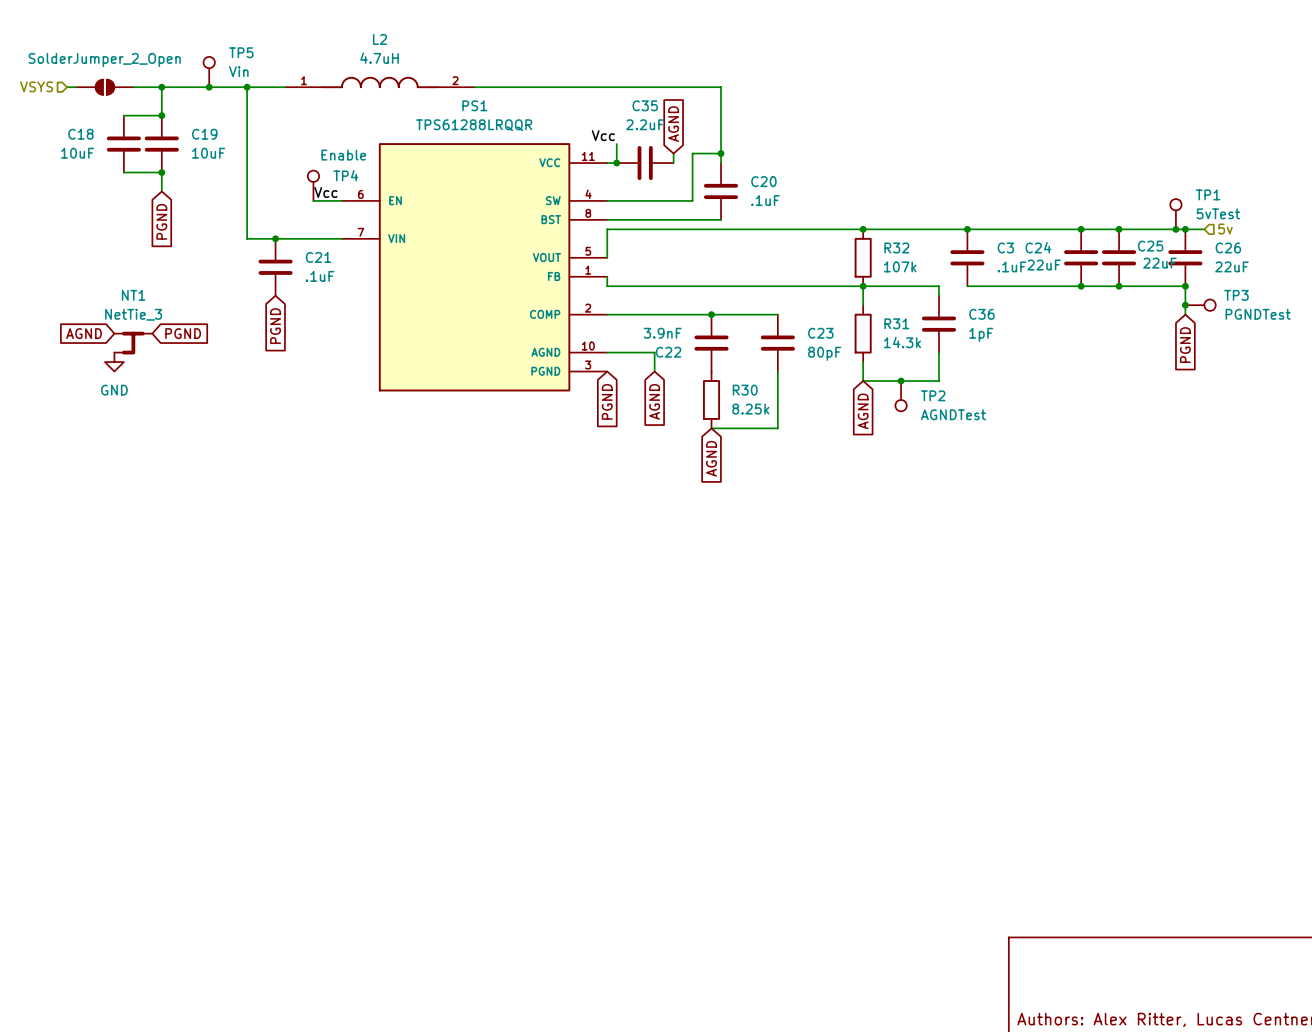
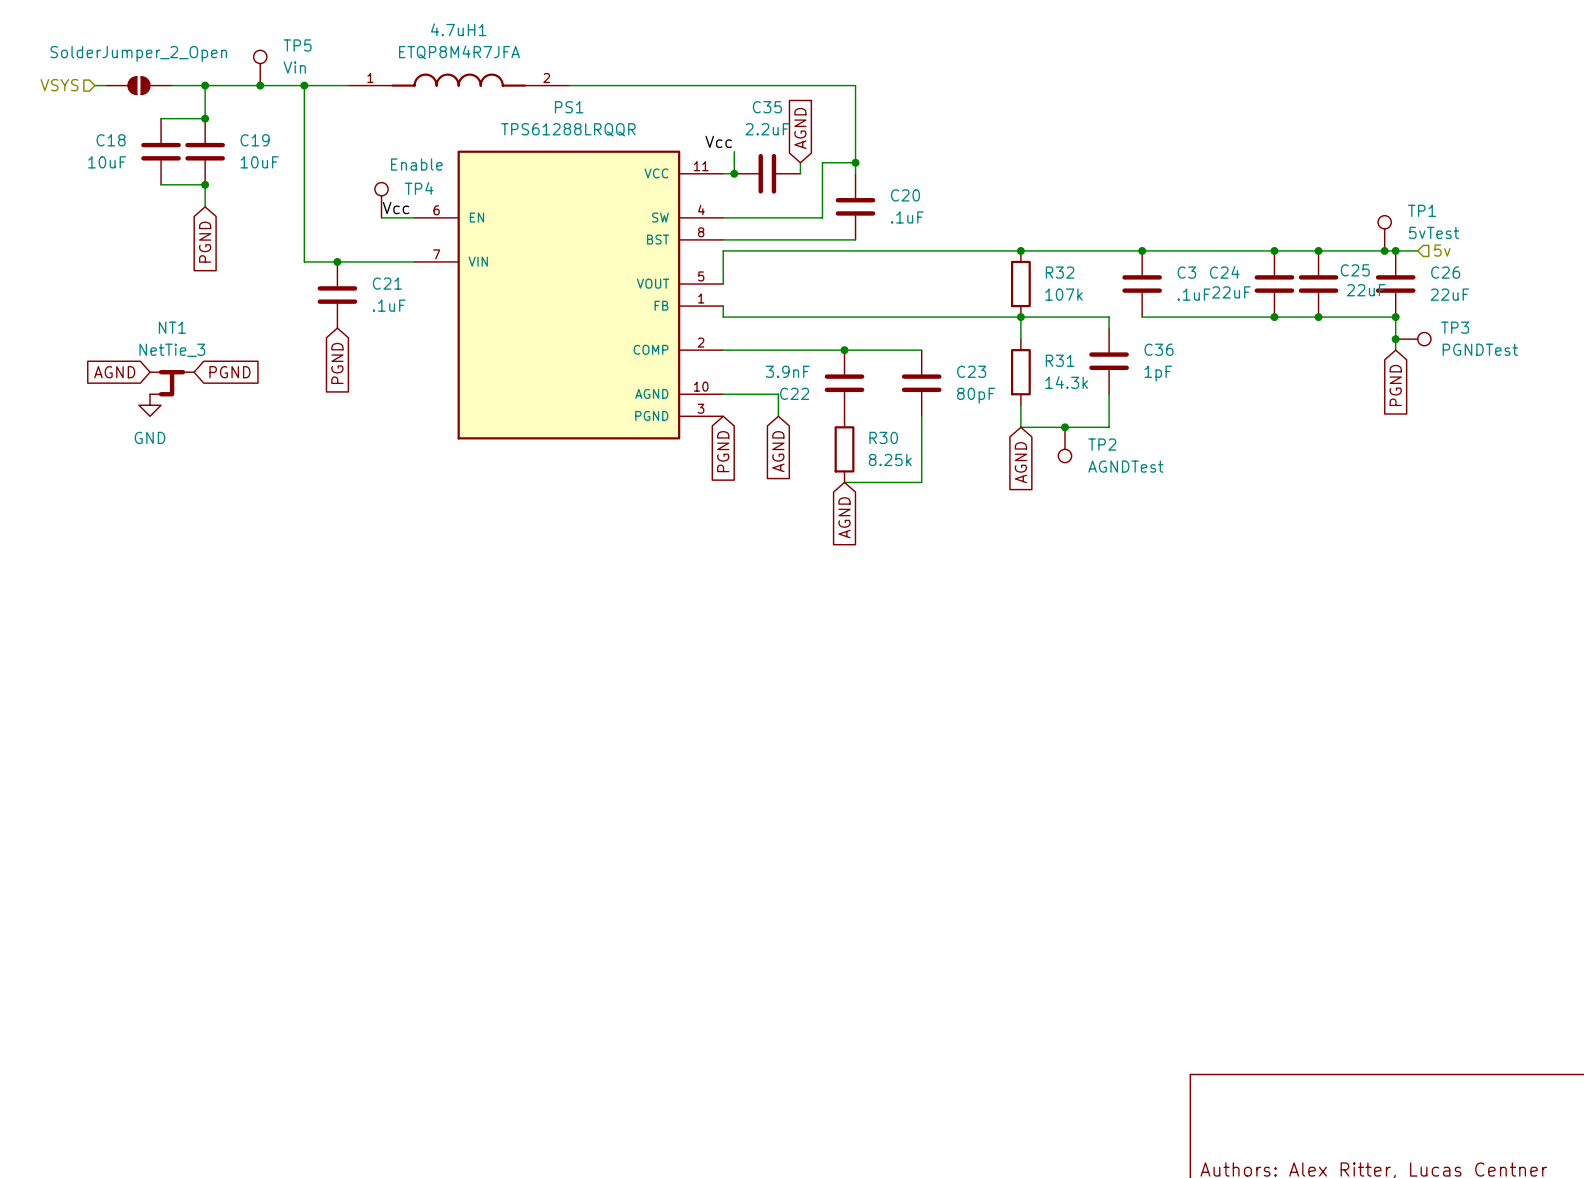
L2 name: L2 (380, 39) -> 4.7uH1 (458, 29)
L2 value: 4.7uH (379, 58) -> ETQP8M4R7JFA (459, 52)

